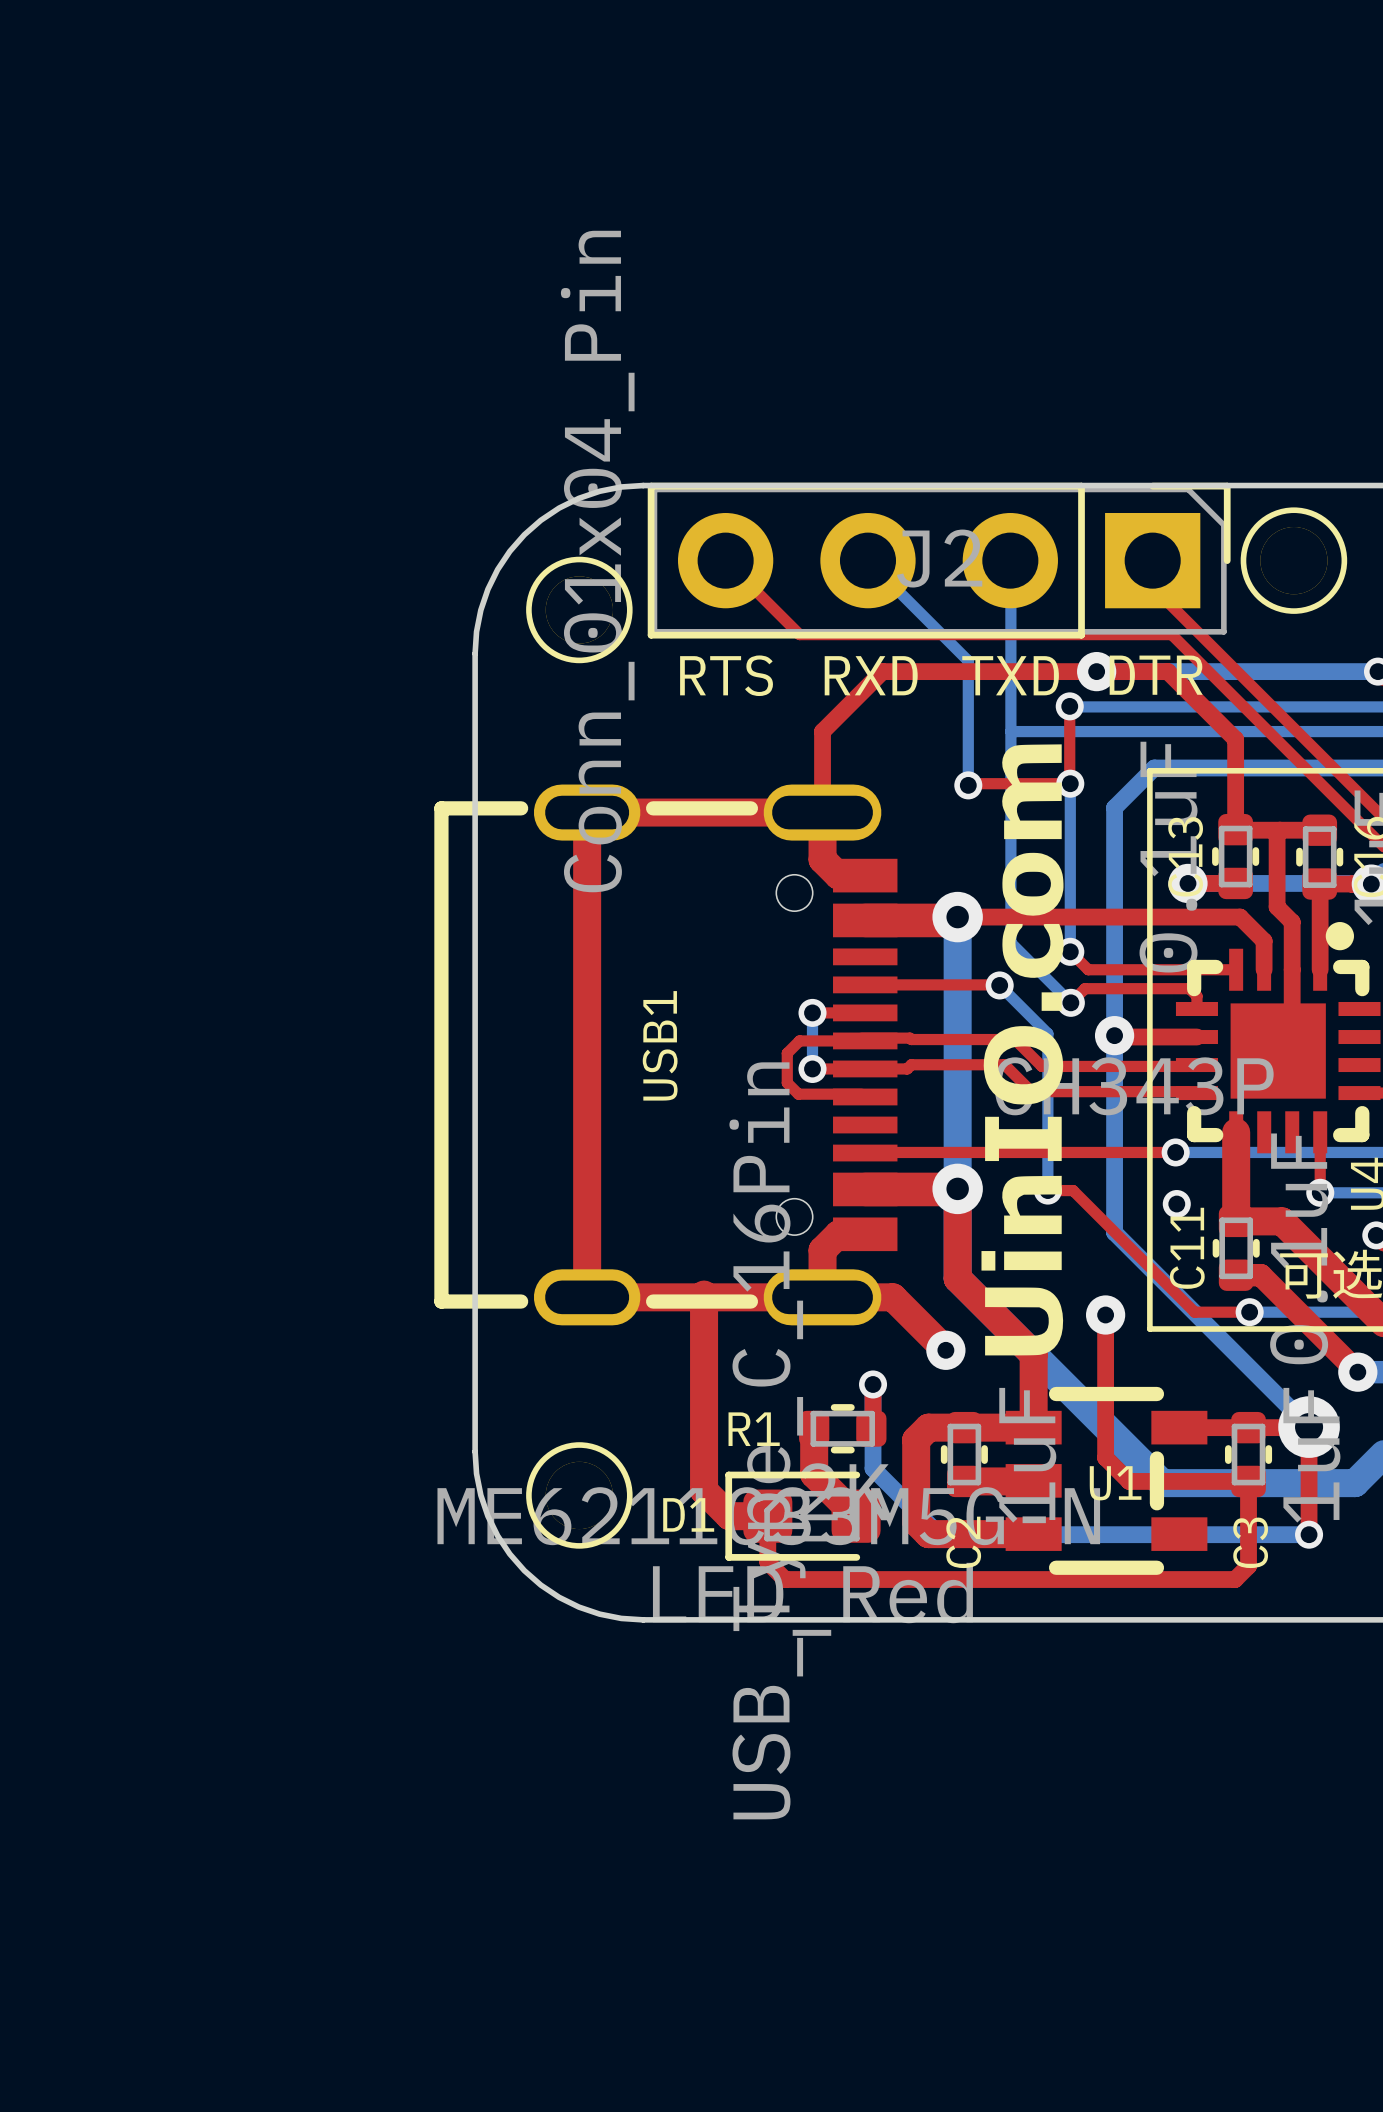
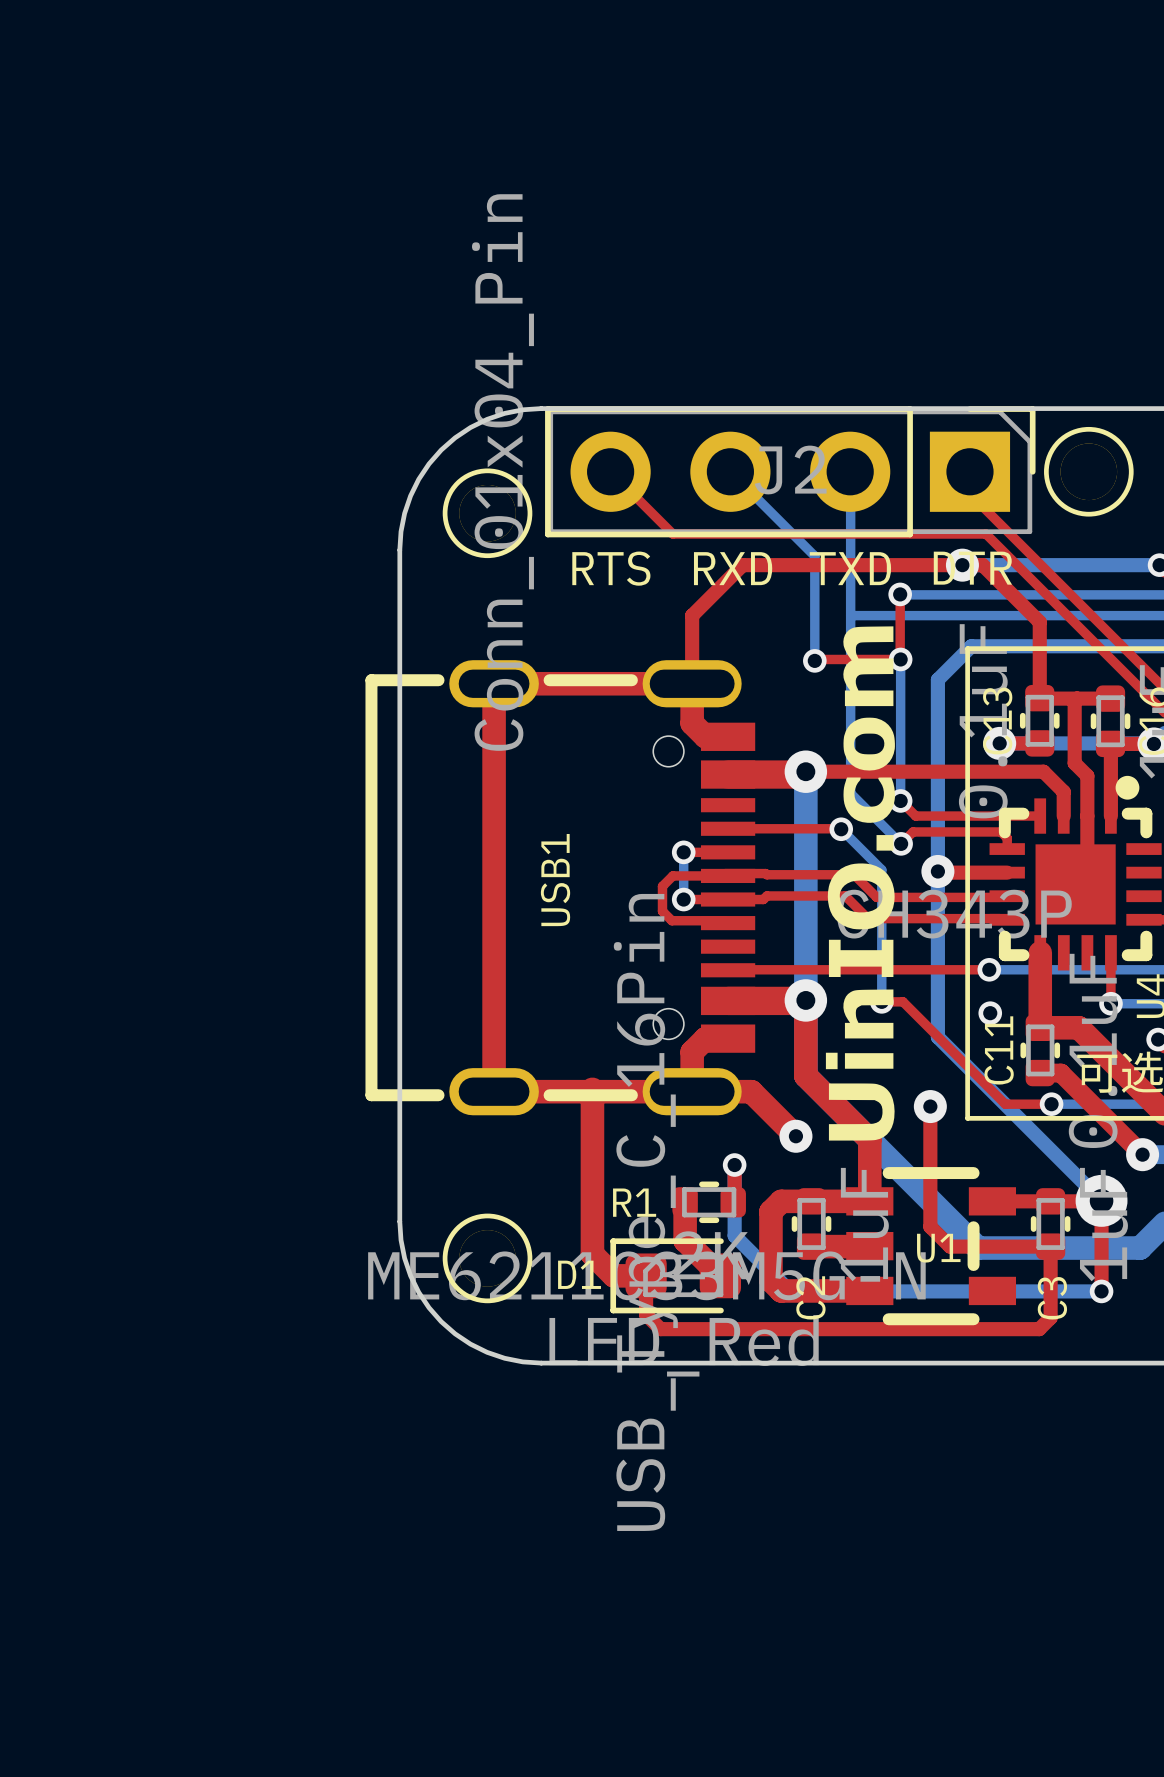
via position: (1096, 671) -> (962, 565)

